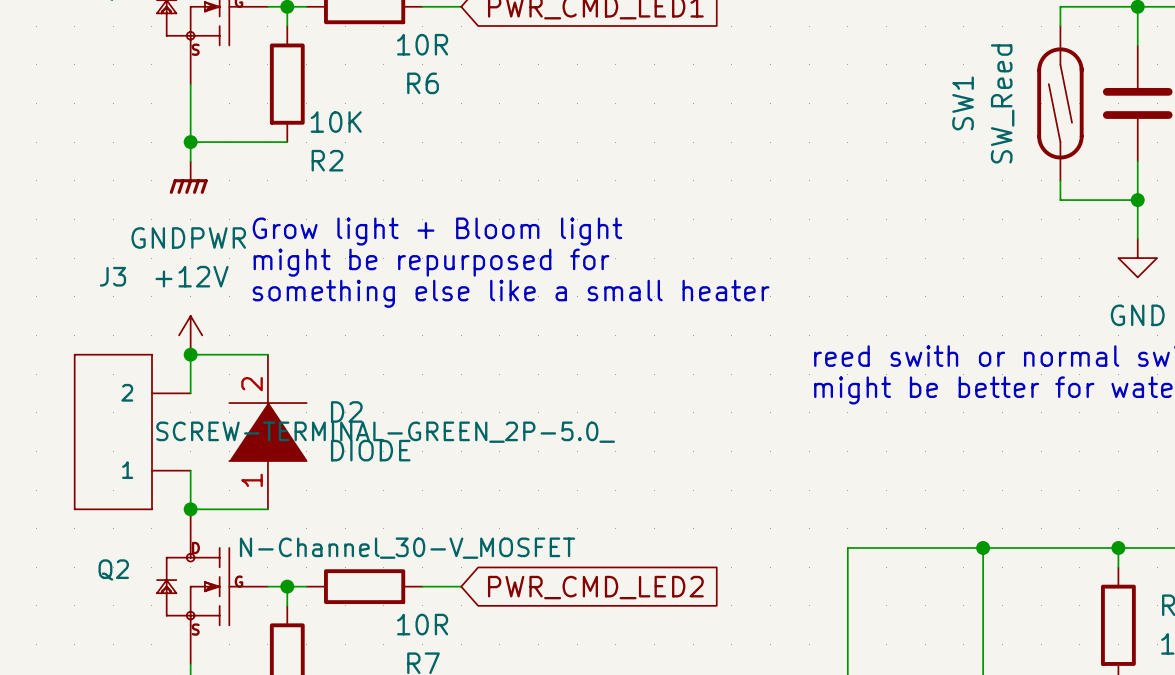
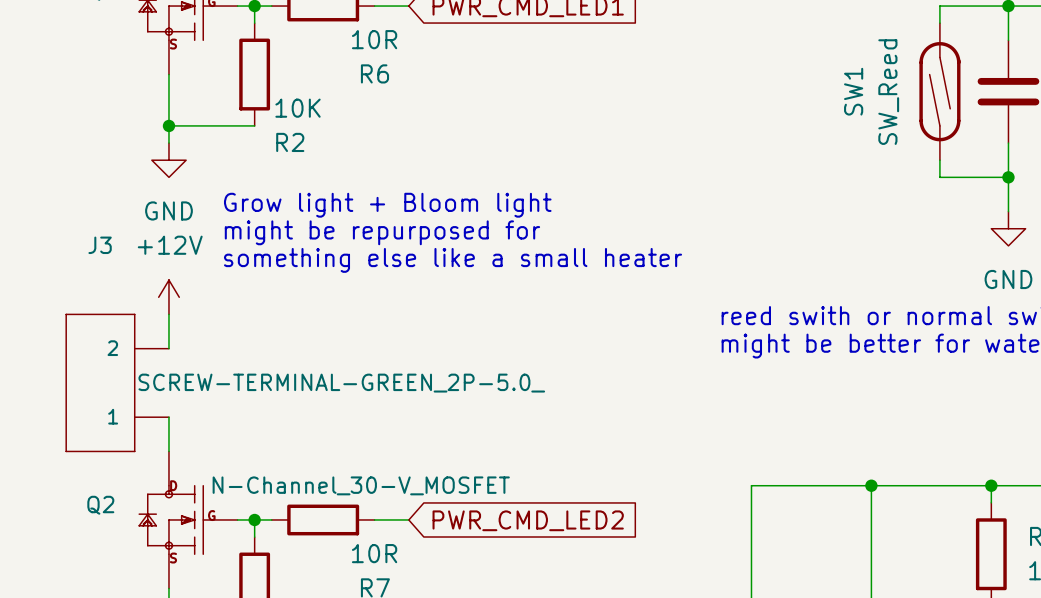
power symbol: GNDPWR (188, 177) -> GND (168, 160)
wire: (190, 354) (267, 354) -> none
junction: (190, 354) -> none
D2: DIODE (267, 432) -> none
wire: (190, 509) (267, 509) -> none
junction: (190, 509) -> none

